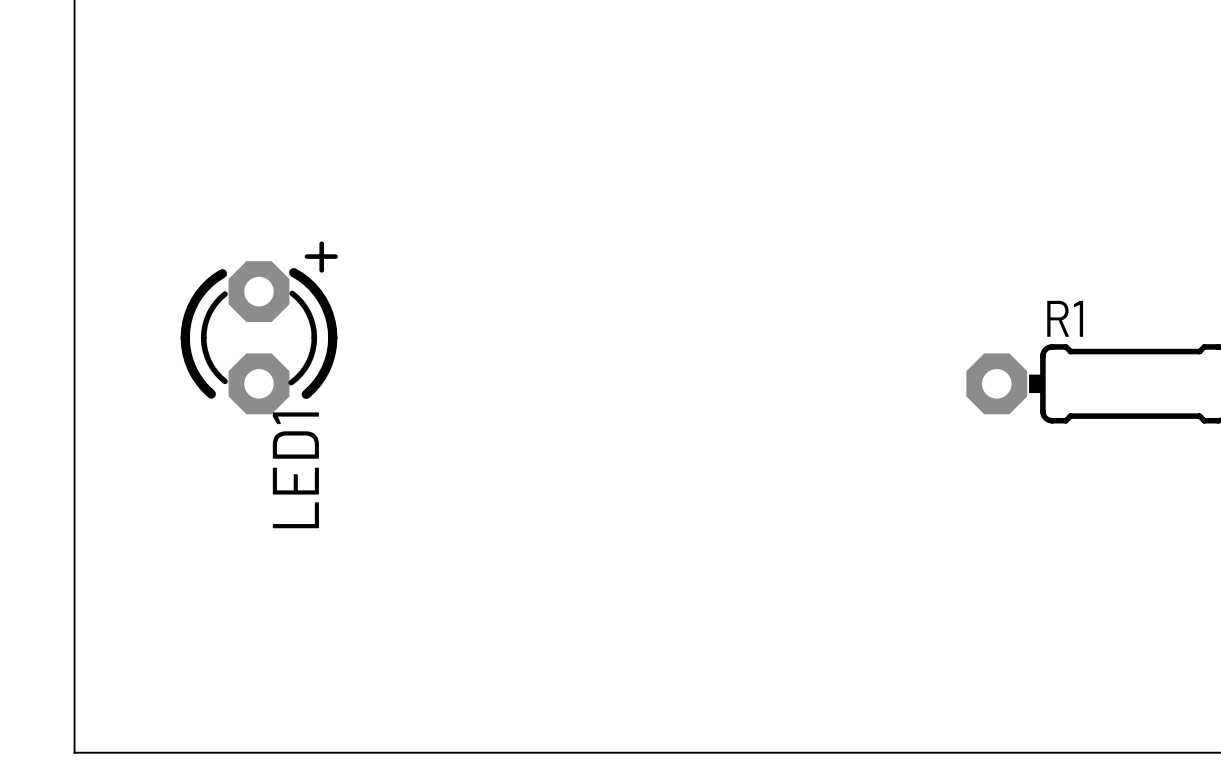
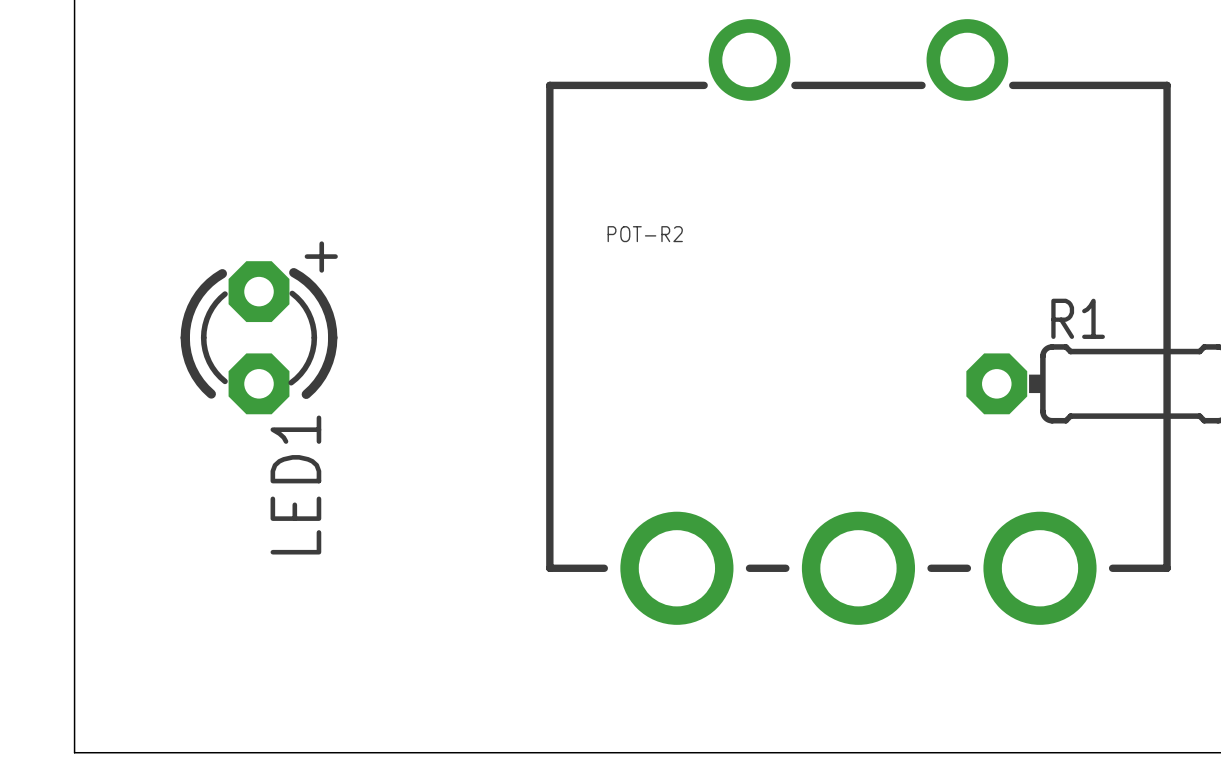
POT-R2: none -> (858, 321)

